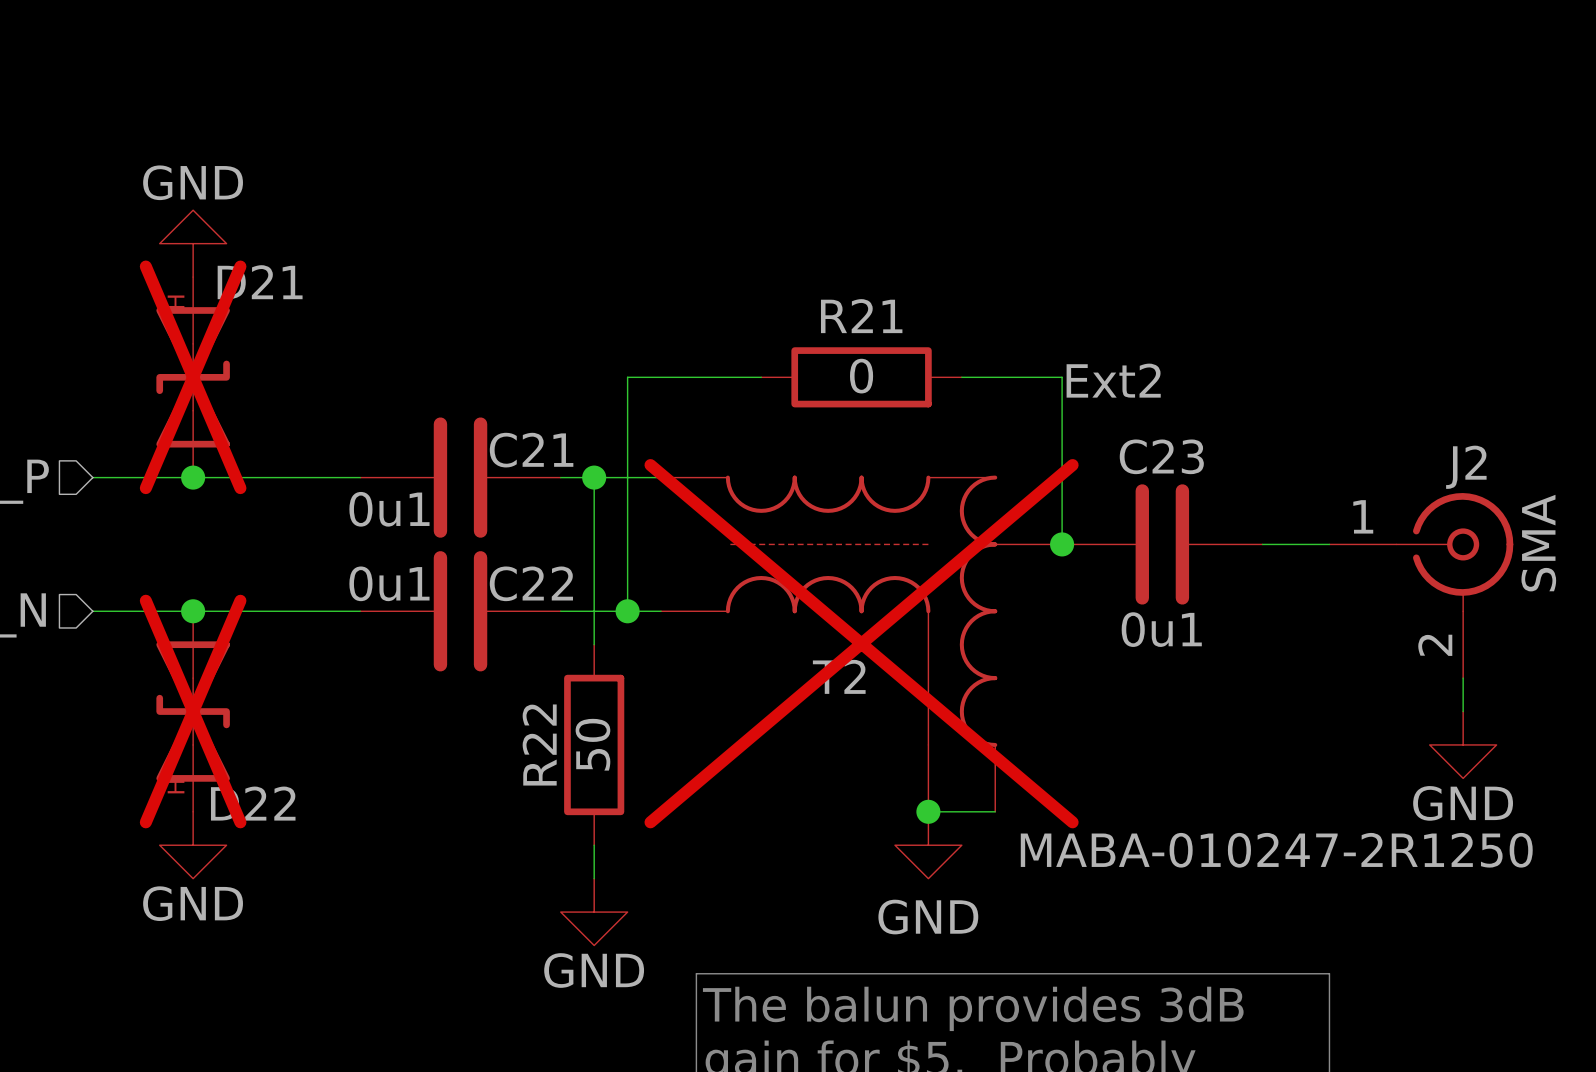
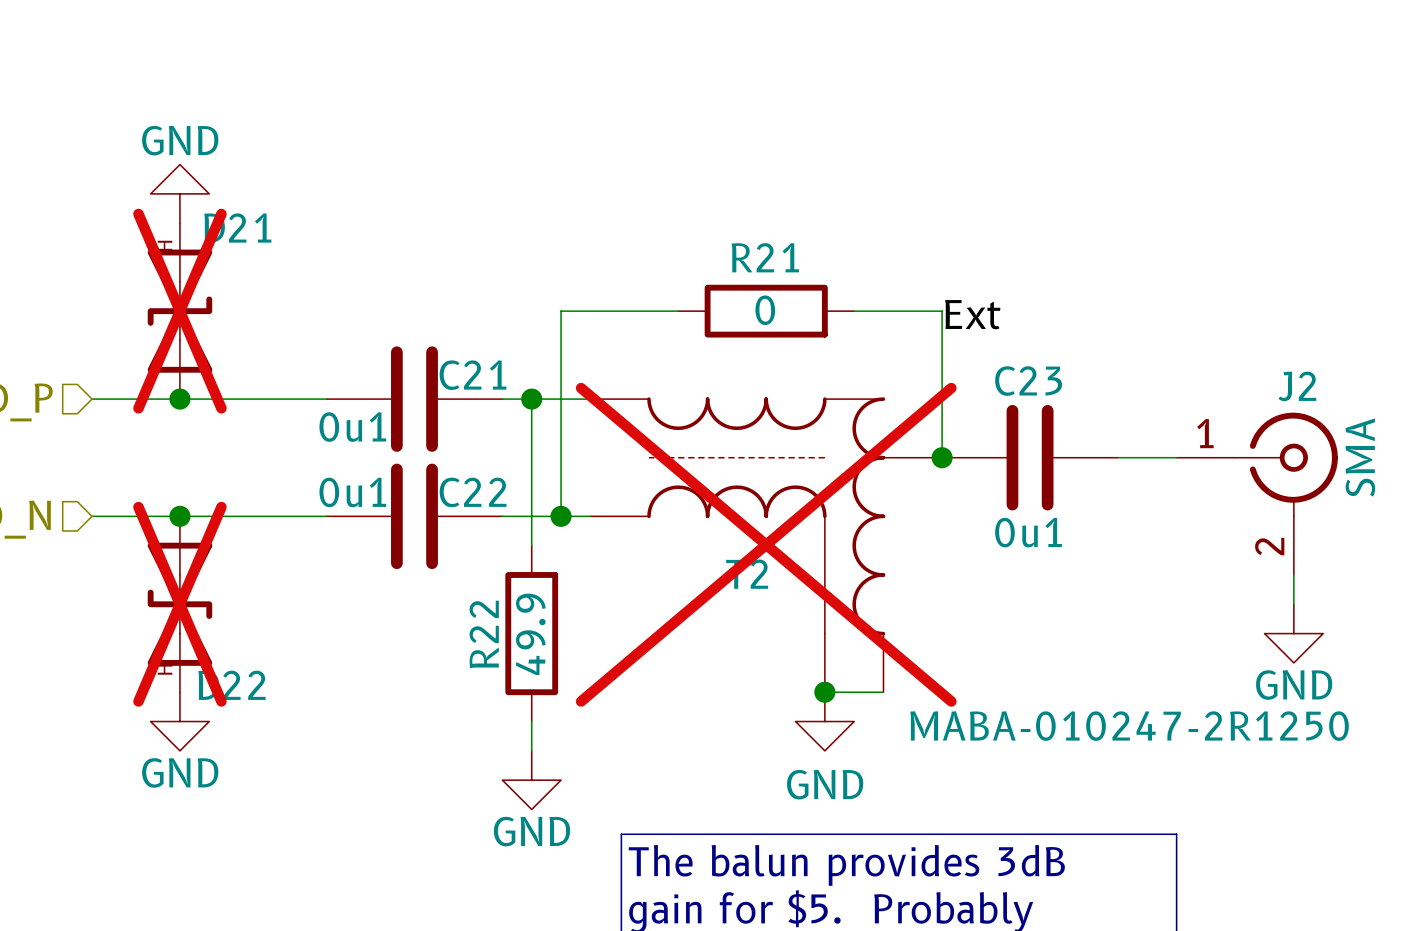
label: Ext2 (1113, 380) -> Ext (972, 314)
R22 value: 50 (592, 744) -> 49.9 (530, 634)

